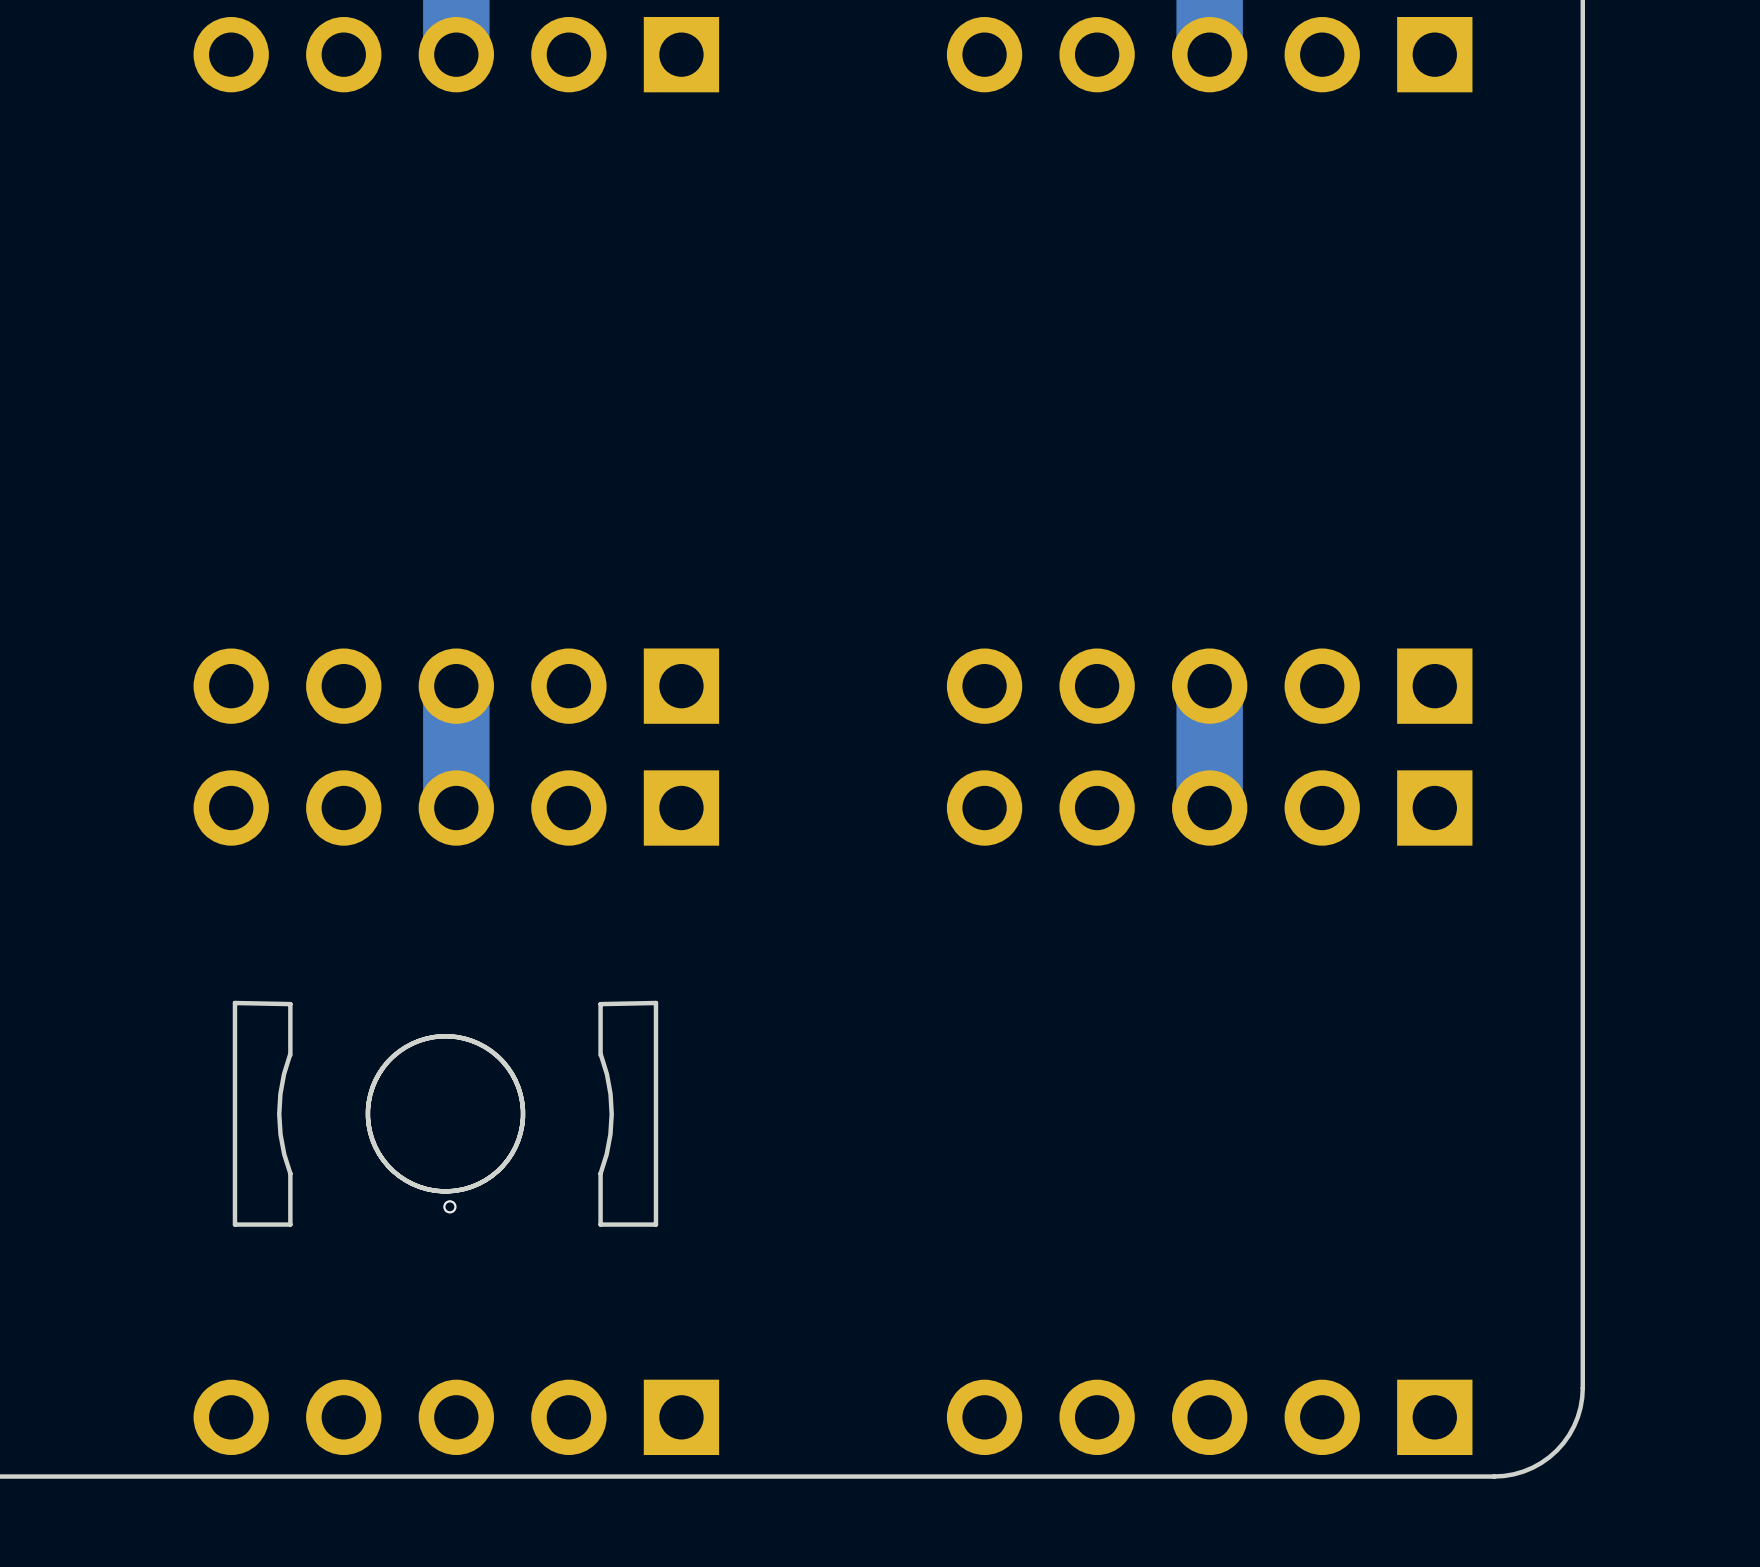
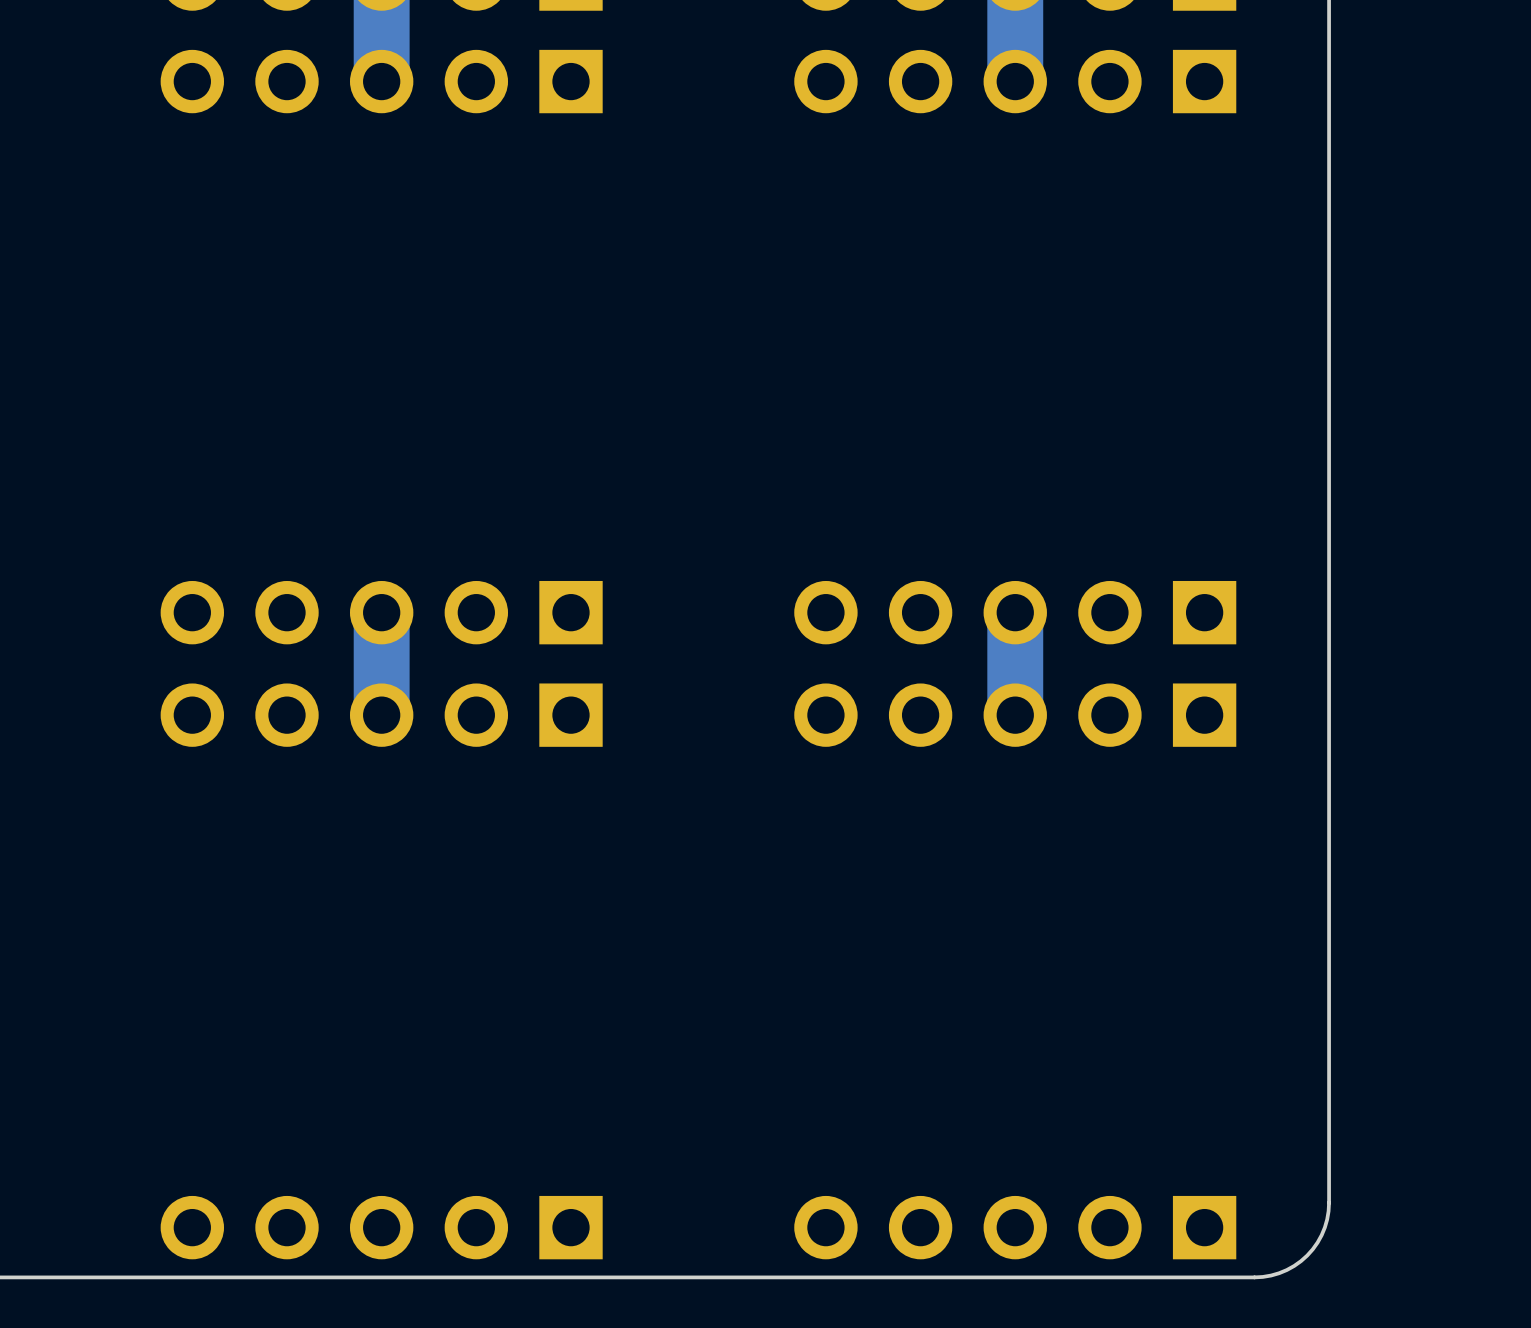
round board edge: [365, 1034, 526, 1194] -> none
board edge: (290, 1054) (280, 1094) (279, 1114) (280, 1134) (290, 1173) (290, 1224) (234, 1224) (234, 1003) (290, 1004) (290, 1055) -> none
board edge: (600, 1054) (610, 1094) (611, 1114) (606, 1154) (600, 1173) (600, 1224) (655, 1224) (655, 1003) (600, 1004) (600, 1055) -> none
via: (449, 1206) -> none

